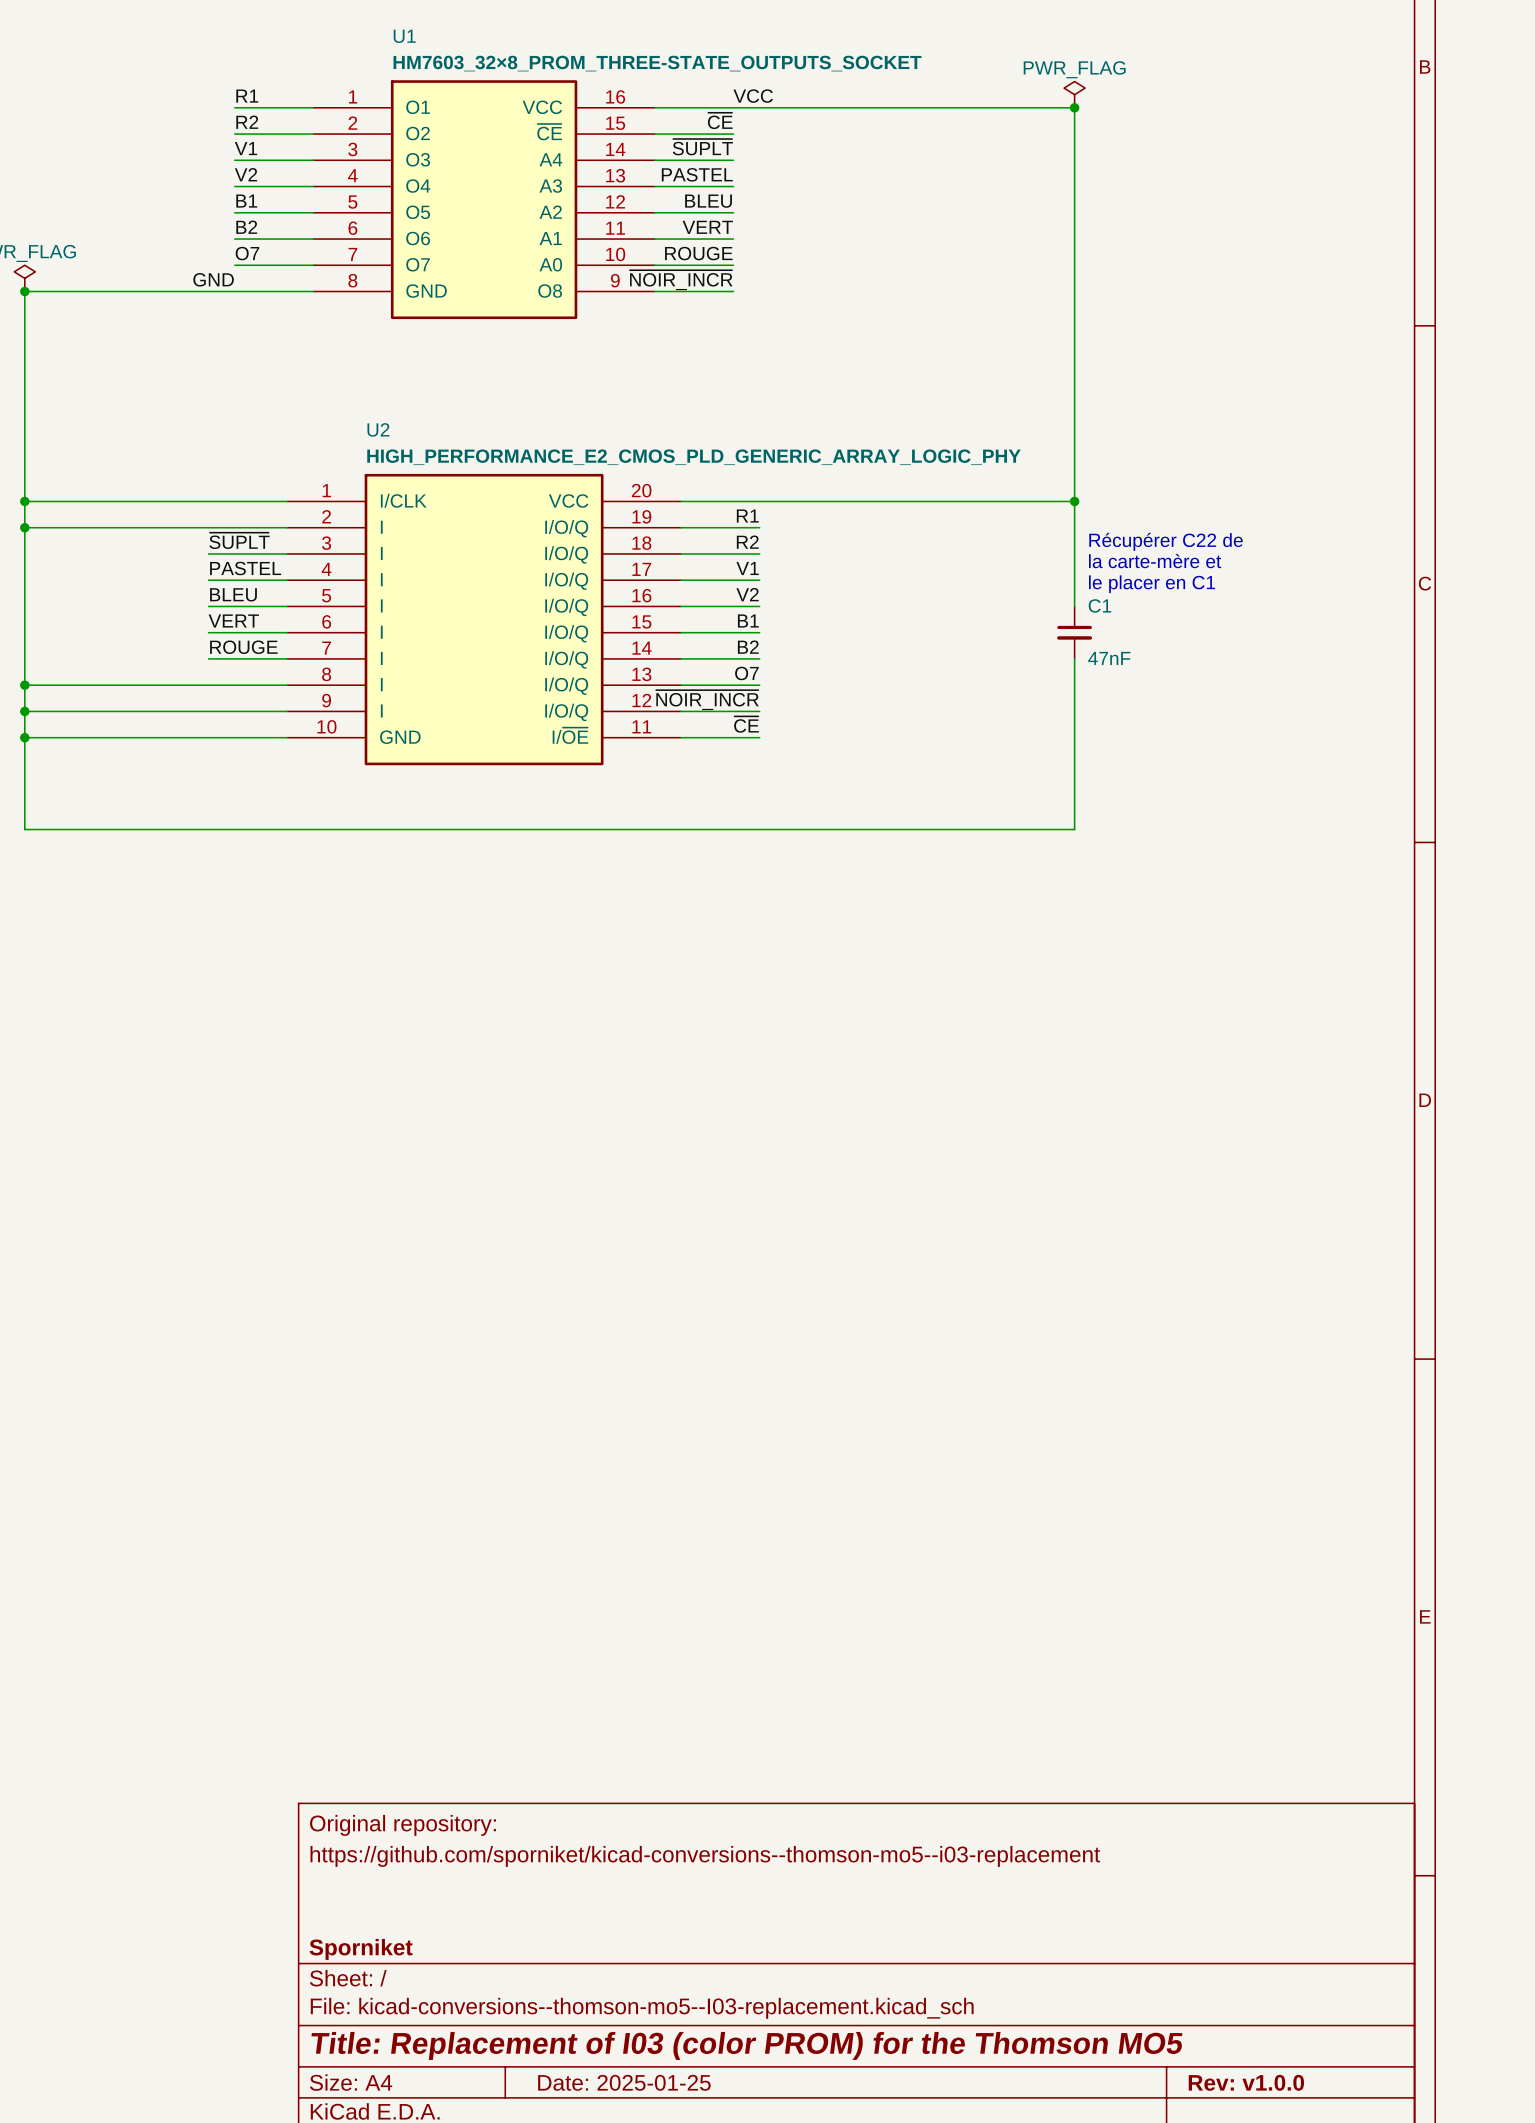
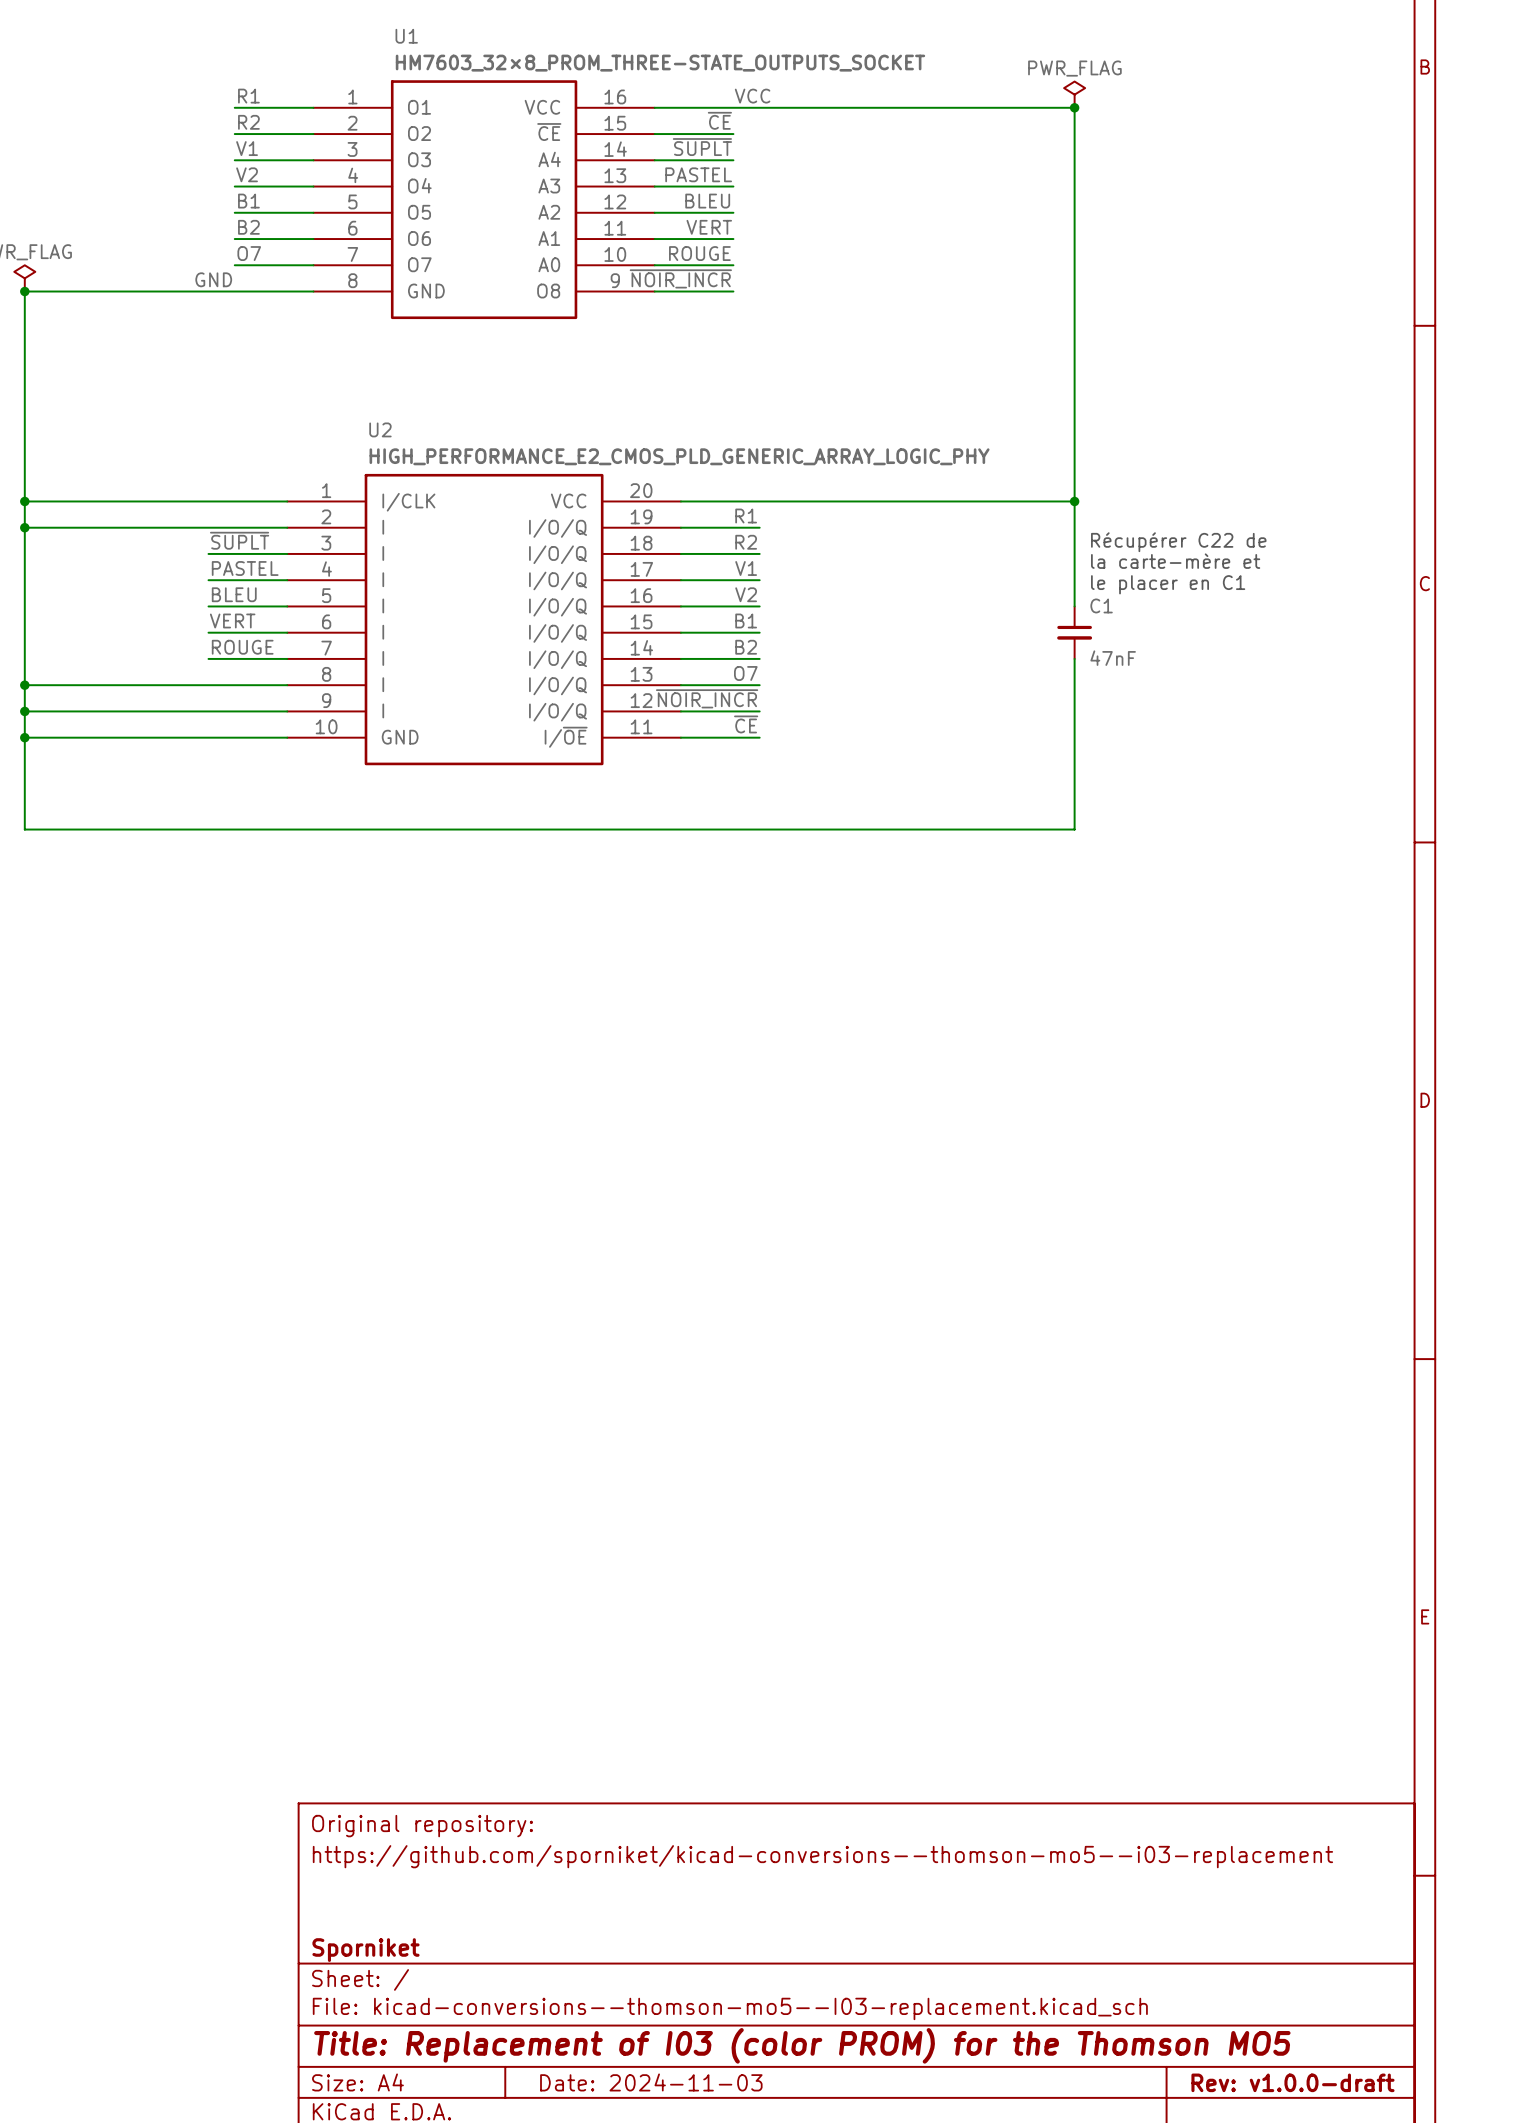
title block: Date: 2025-01-25 (624, 2082) -> Date: 2024-11-03 (651, 2082)
title block: Rev: v1.0.0 (1246, 2082) -> Rev: v1.0.0-draft (1292, 2082)

